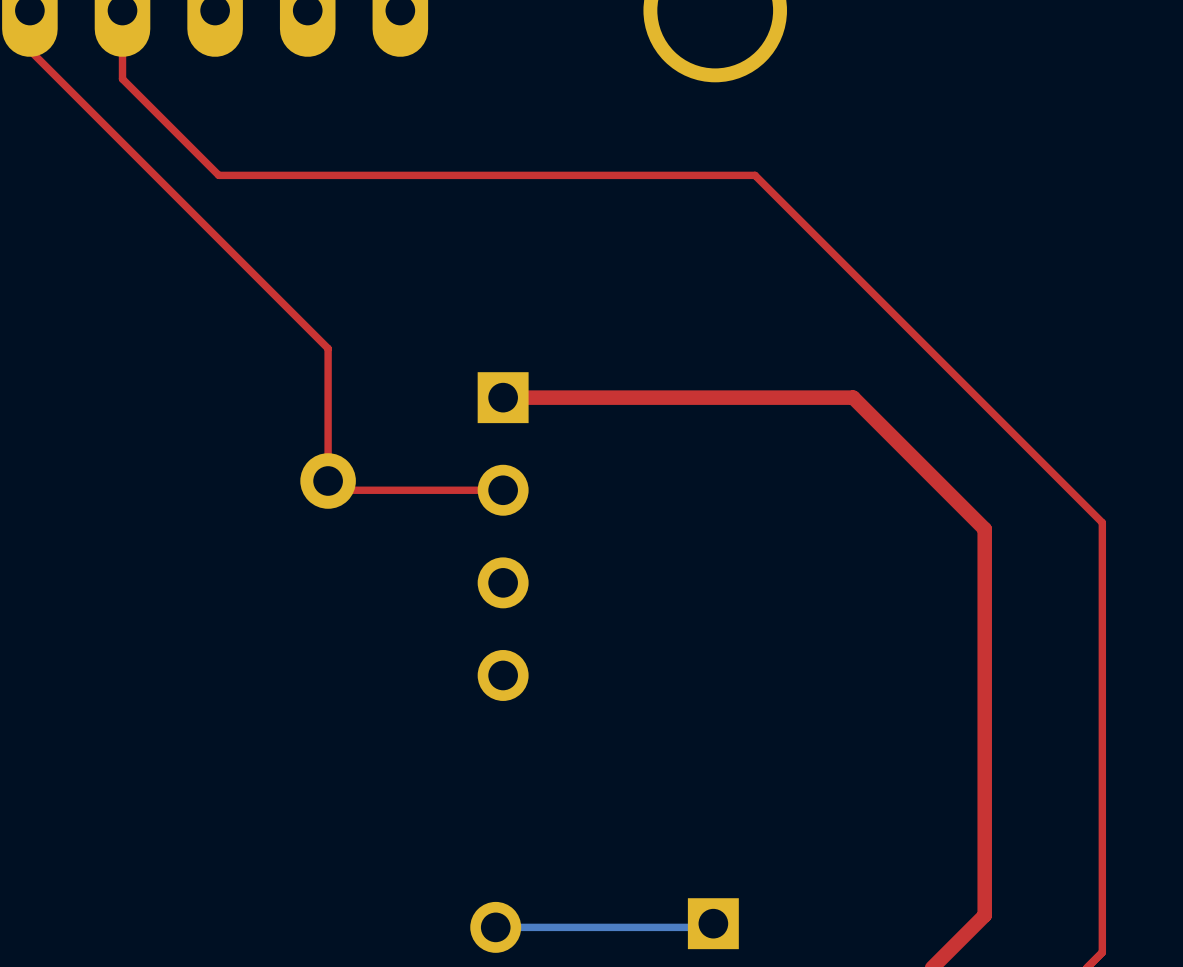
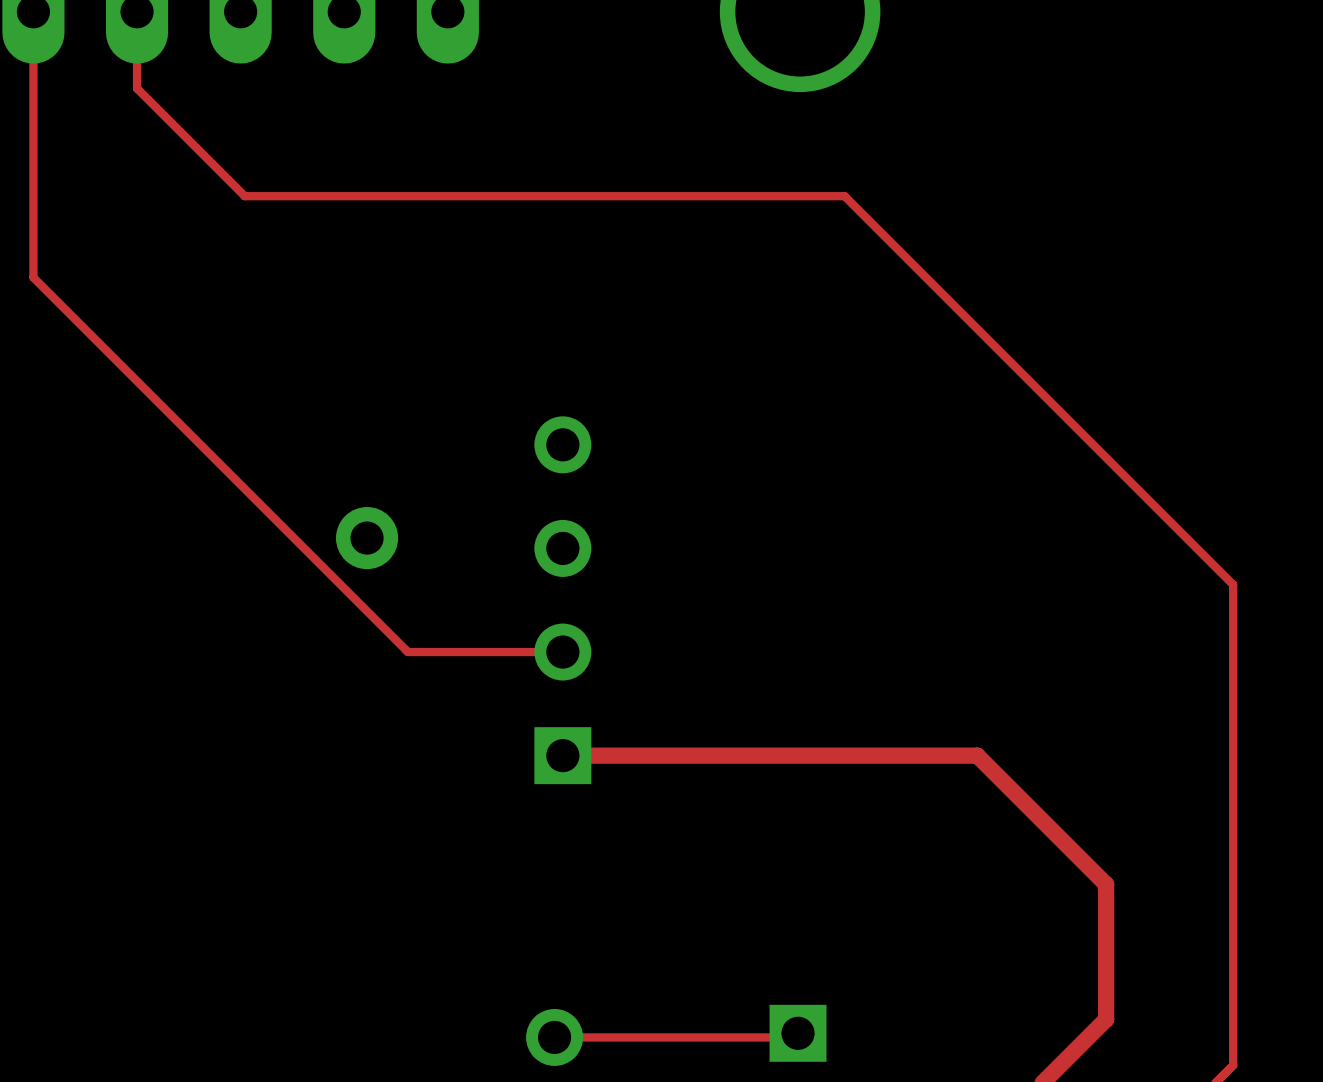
top track: (29, 50) (328, 348) (328, 480) (337, 490) (503, 490) -> (33, 56) (33, 277) (407, 652) (562, 652)
top track: (503, 397) (853, 397) (984, 529) (984, 915) -> (562, 755) (977, 755) (1106, 884) (1106, 1019) (1101, 1023)
part rotation: 0° (503, 536) -> 180° (562, 600)
top track: none -> (798, 1033) (793, 1037) (554, 1037)
bottom track: (713, 923) (709, 927) (495, 927) -> none

